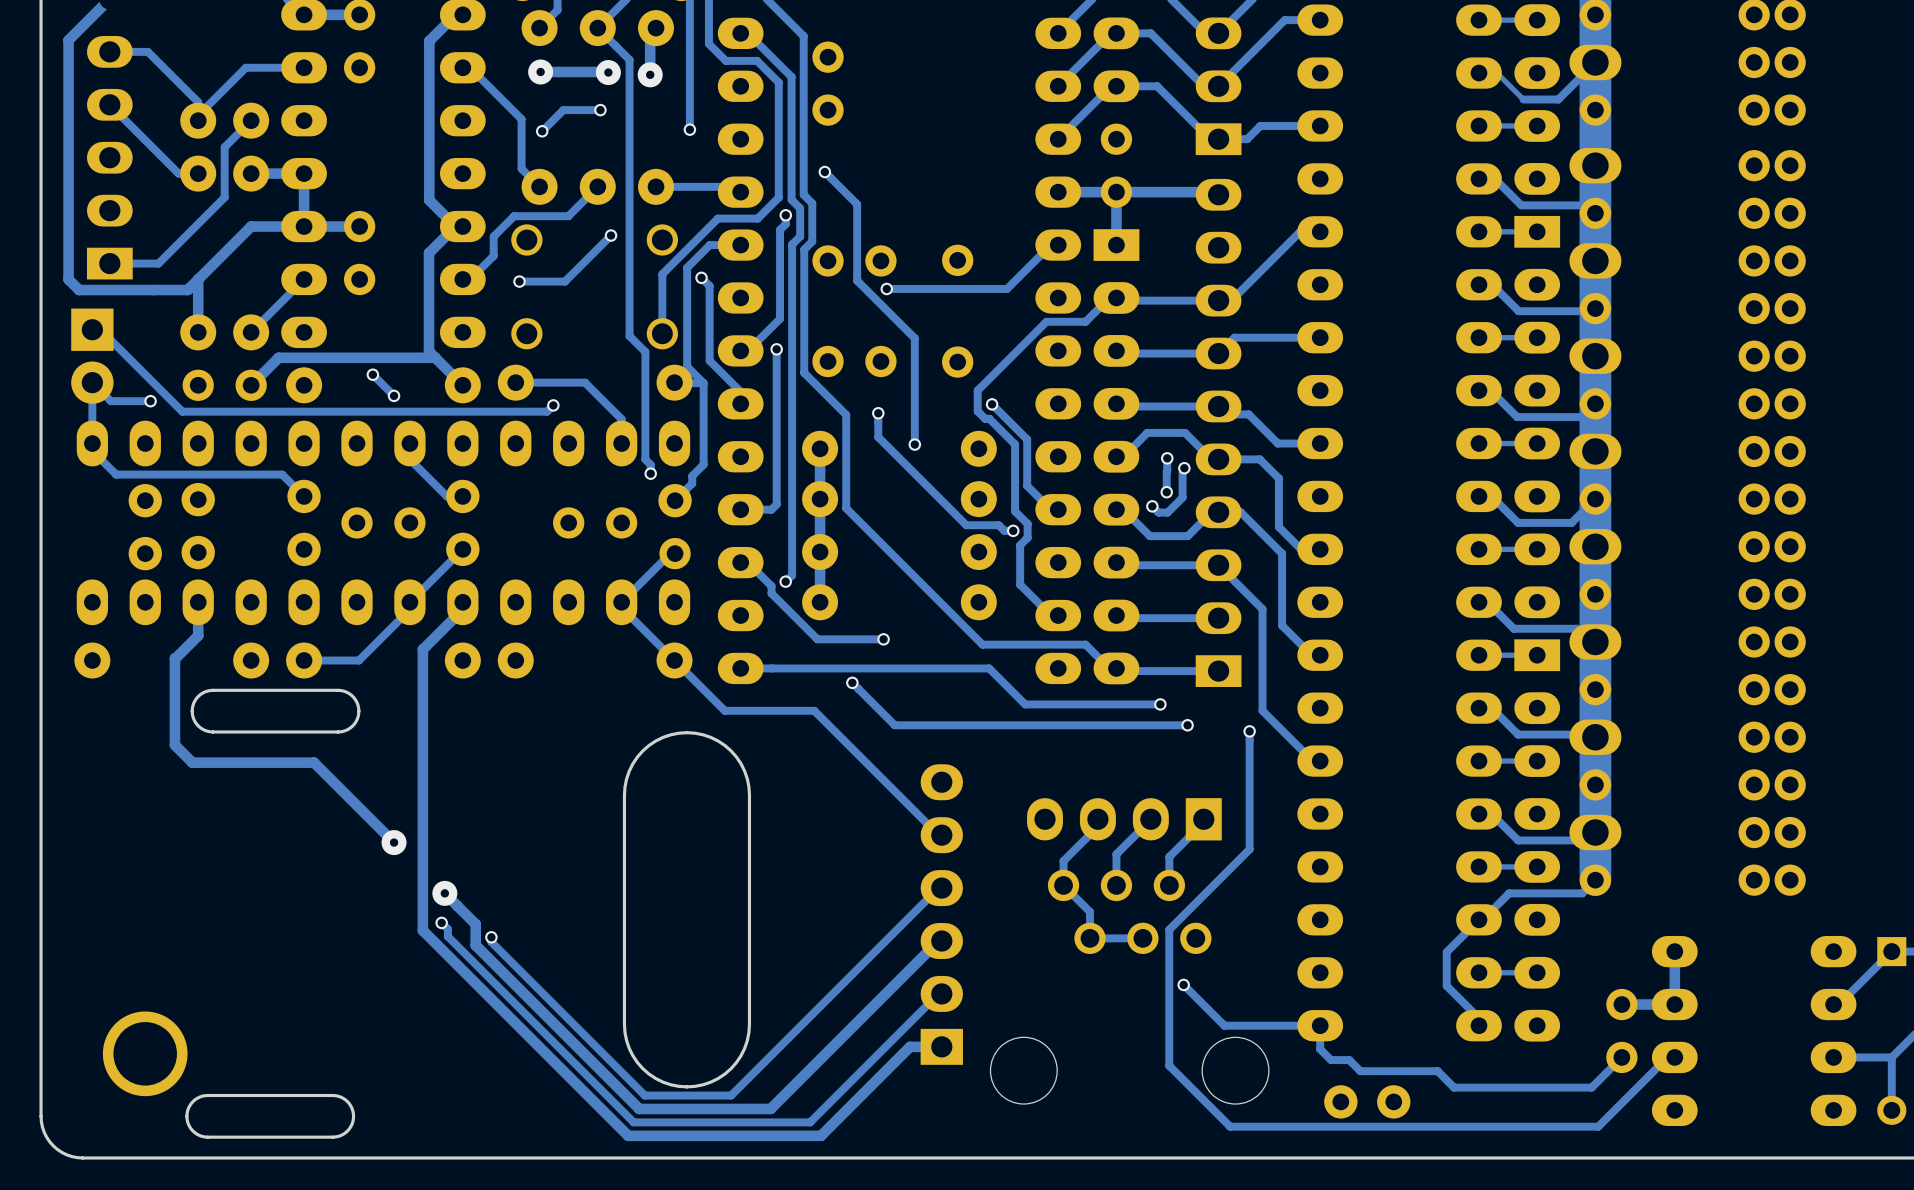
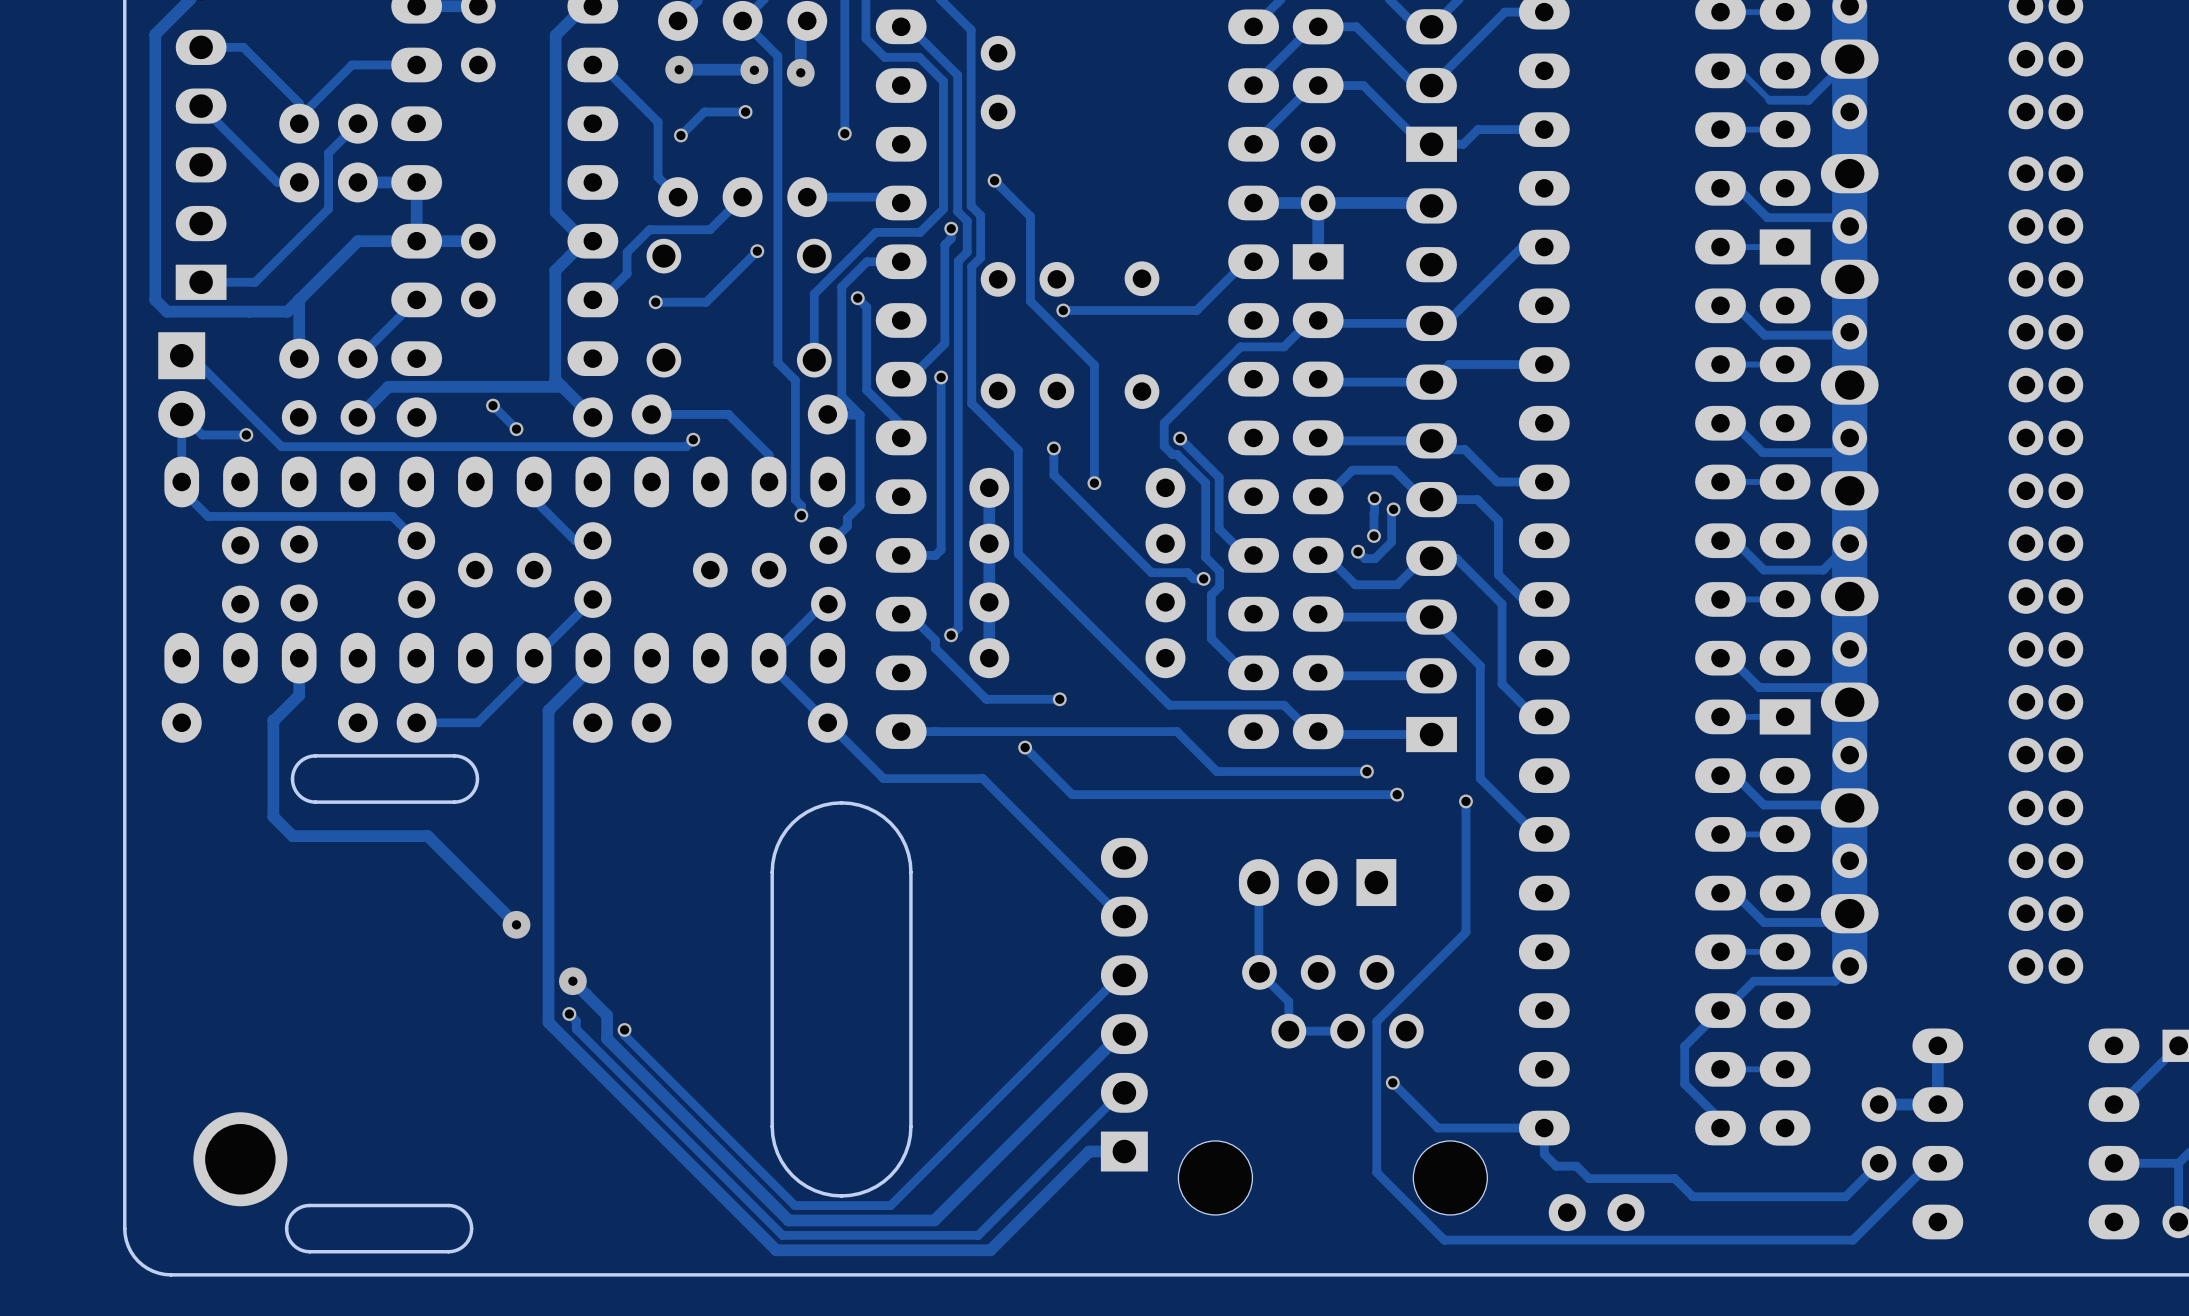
part footprint: [1027, 798, 1222, 841] -> [1238, 859, 1397, 907]
track: (1097, 819) (1097, 826) (1063, 861) (1063, 885) -> (1258, 882) (1258, 971)
track: (1150, 819) (1116, 854) (1116, 885) -> none
track: (1203, 819) (1203, 822) (1169, 856) (1169, 885) -> none

